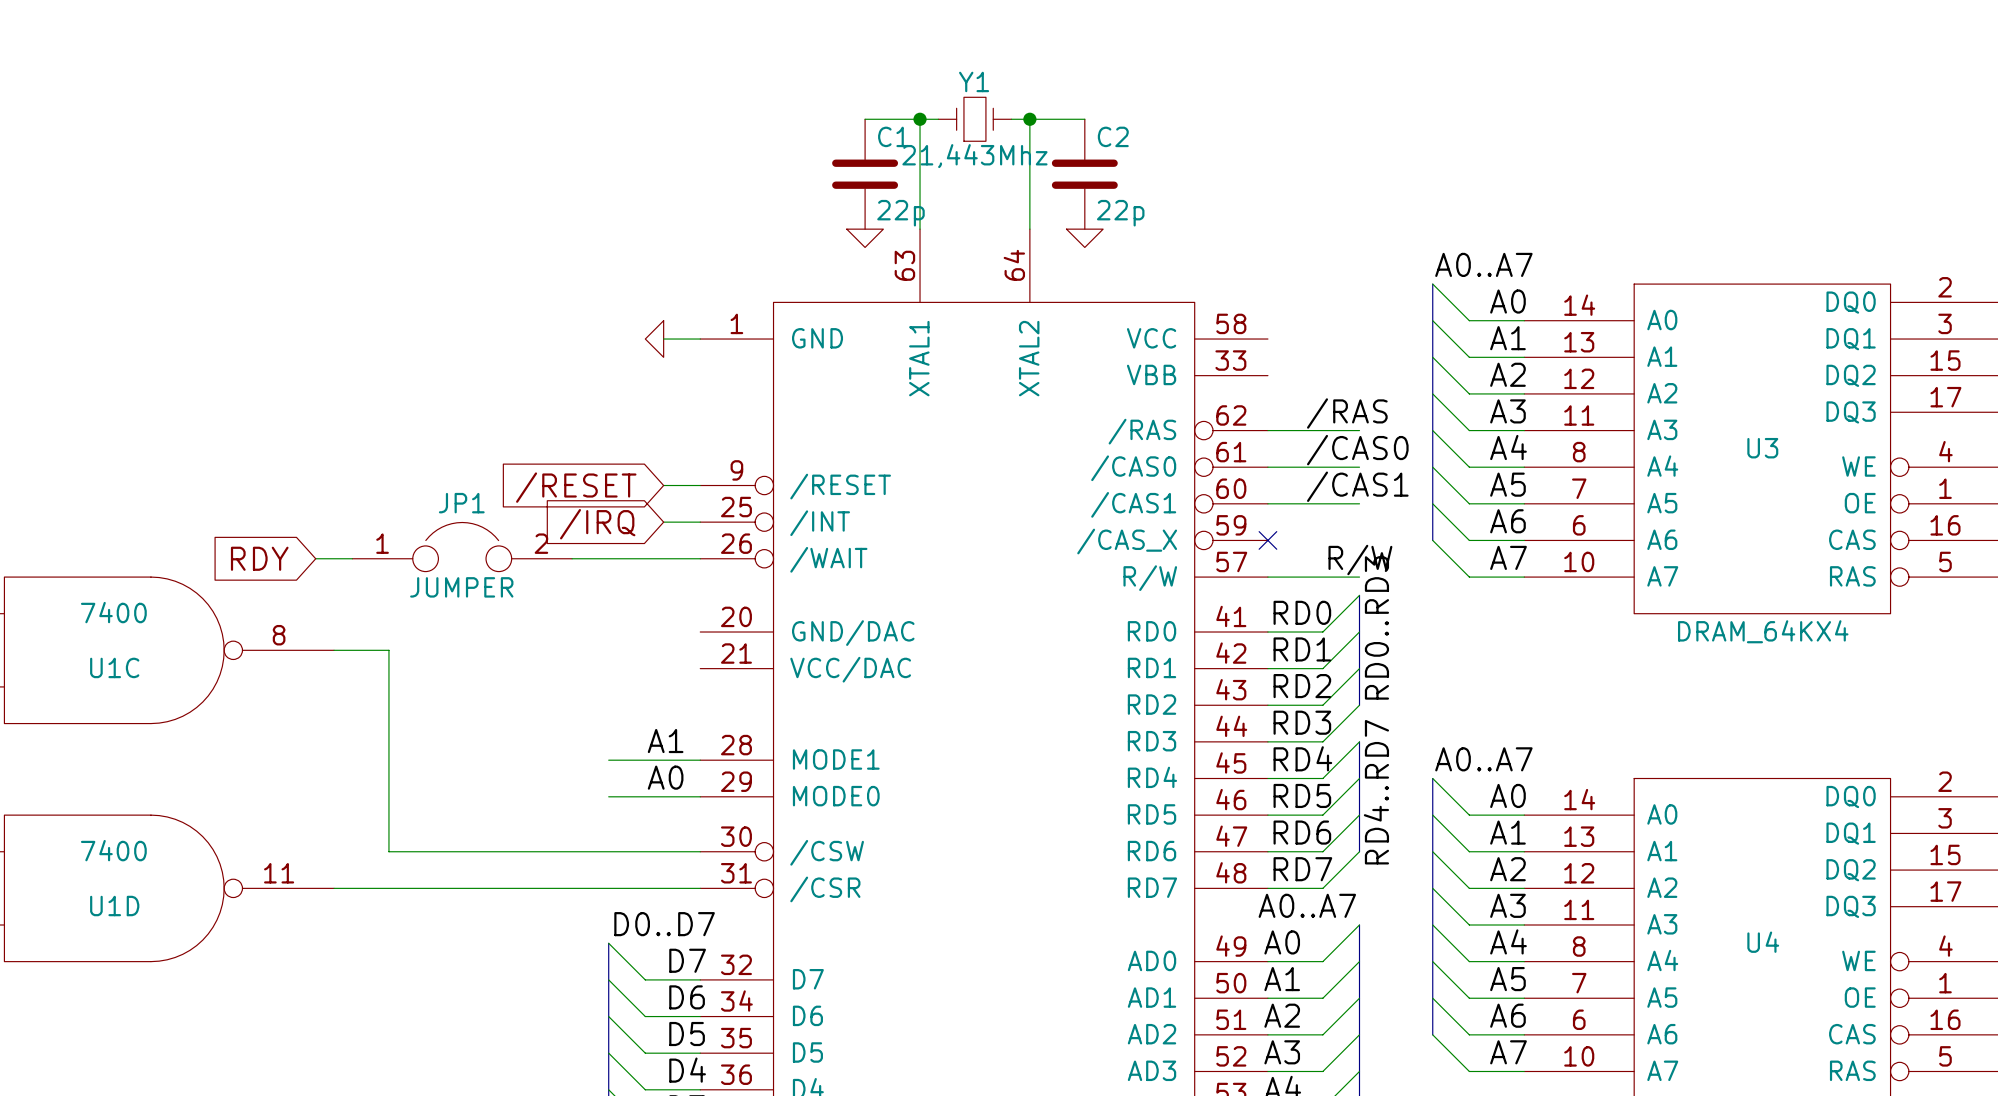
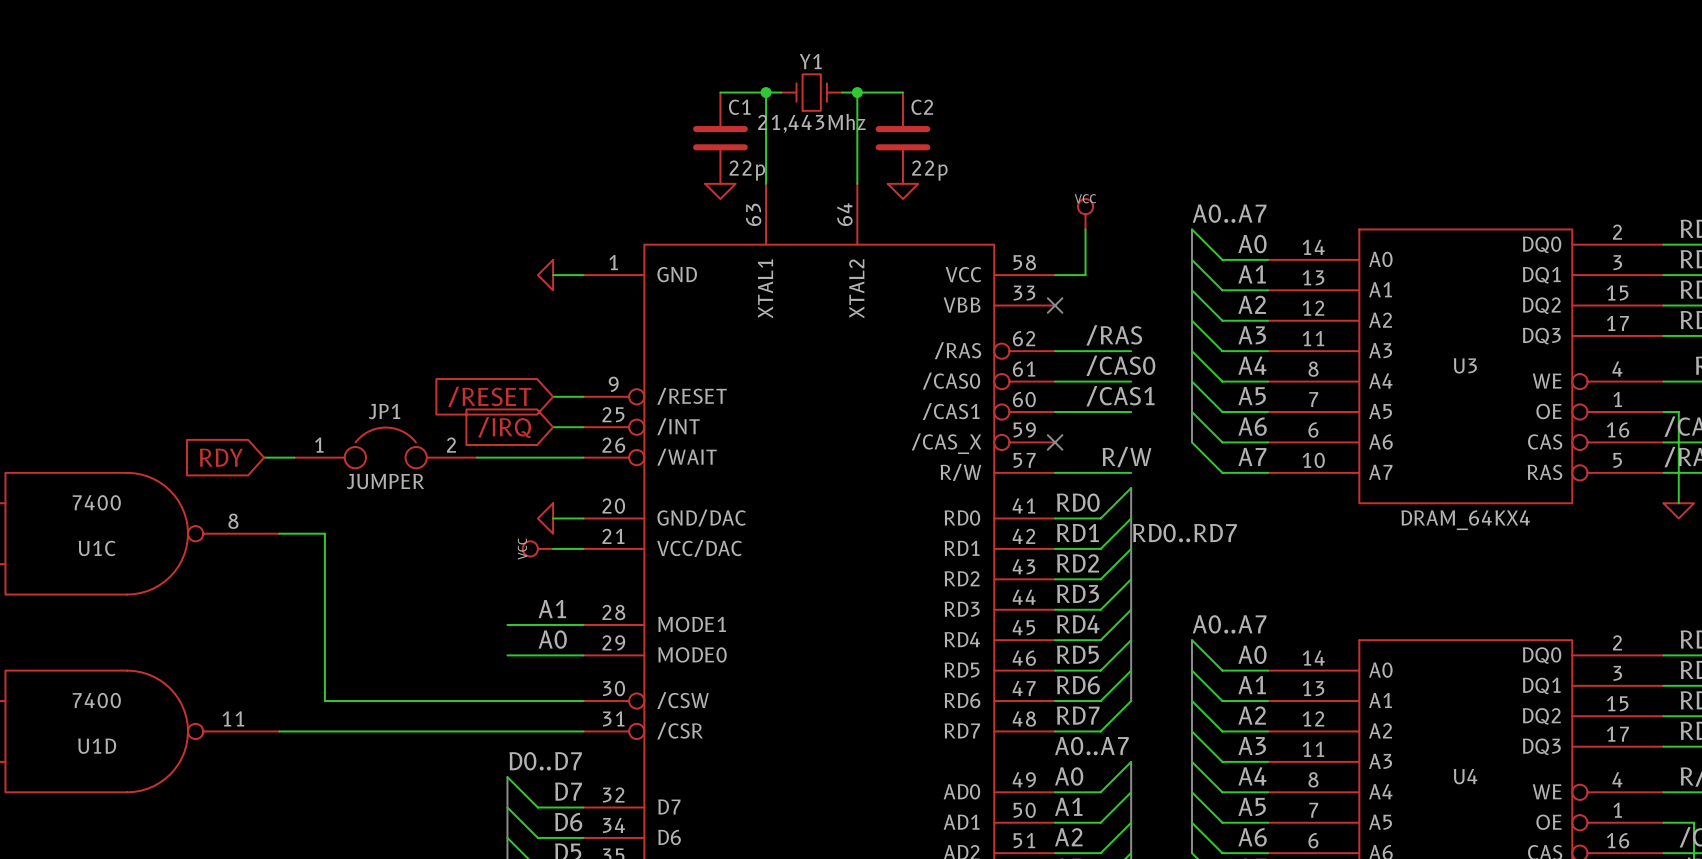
power symbol: none -> VCC (1085, 214)
wire: none -> (1085, 229) (1085, 275) (1055, 275)
no-connect mark: none -> (1055, 305)
label: RD0..RD3 (1376, 627) -> RD0..RD7 (1184, 533)
power symbol: none -> (545, 518)
wire: none -> (553, 518) (583, 518)
power symbol: none -> VCC (537, 548)
wire: none -> (553, 548) (583, 548)
bus: none -> (1131, 579) (1131, 609)
label: RD4..RD7 (1376, 792) -> none

